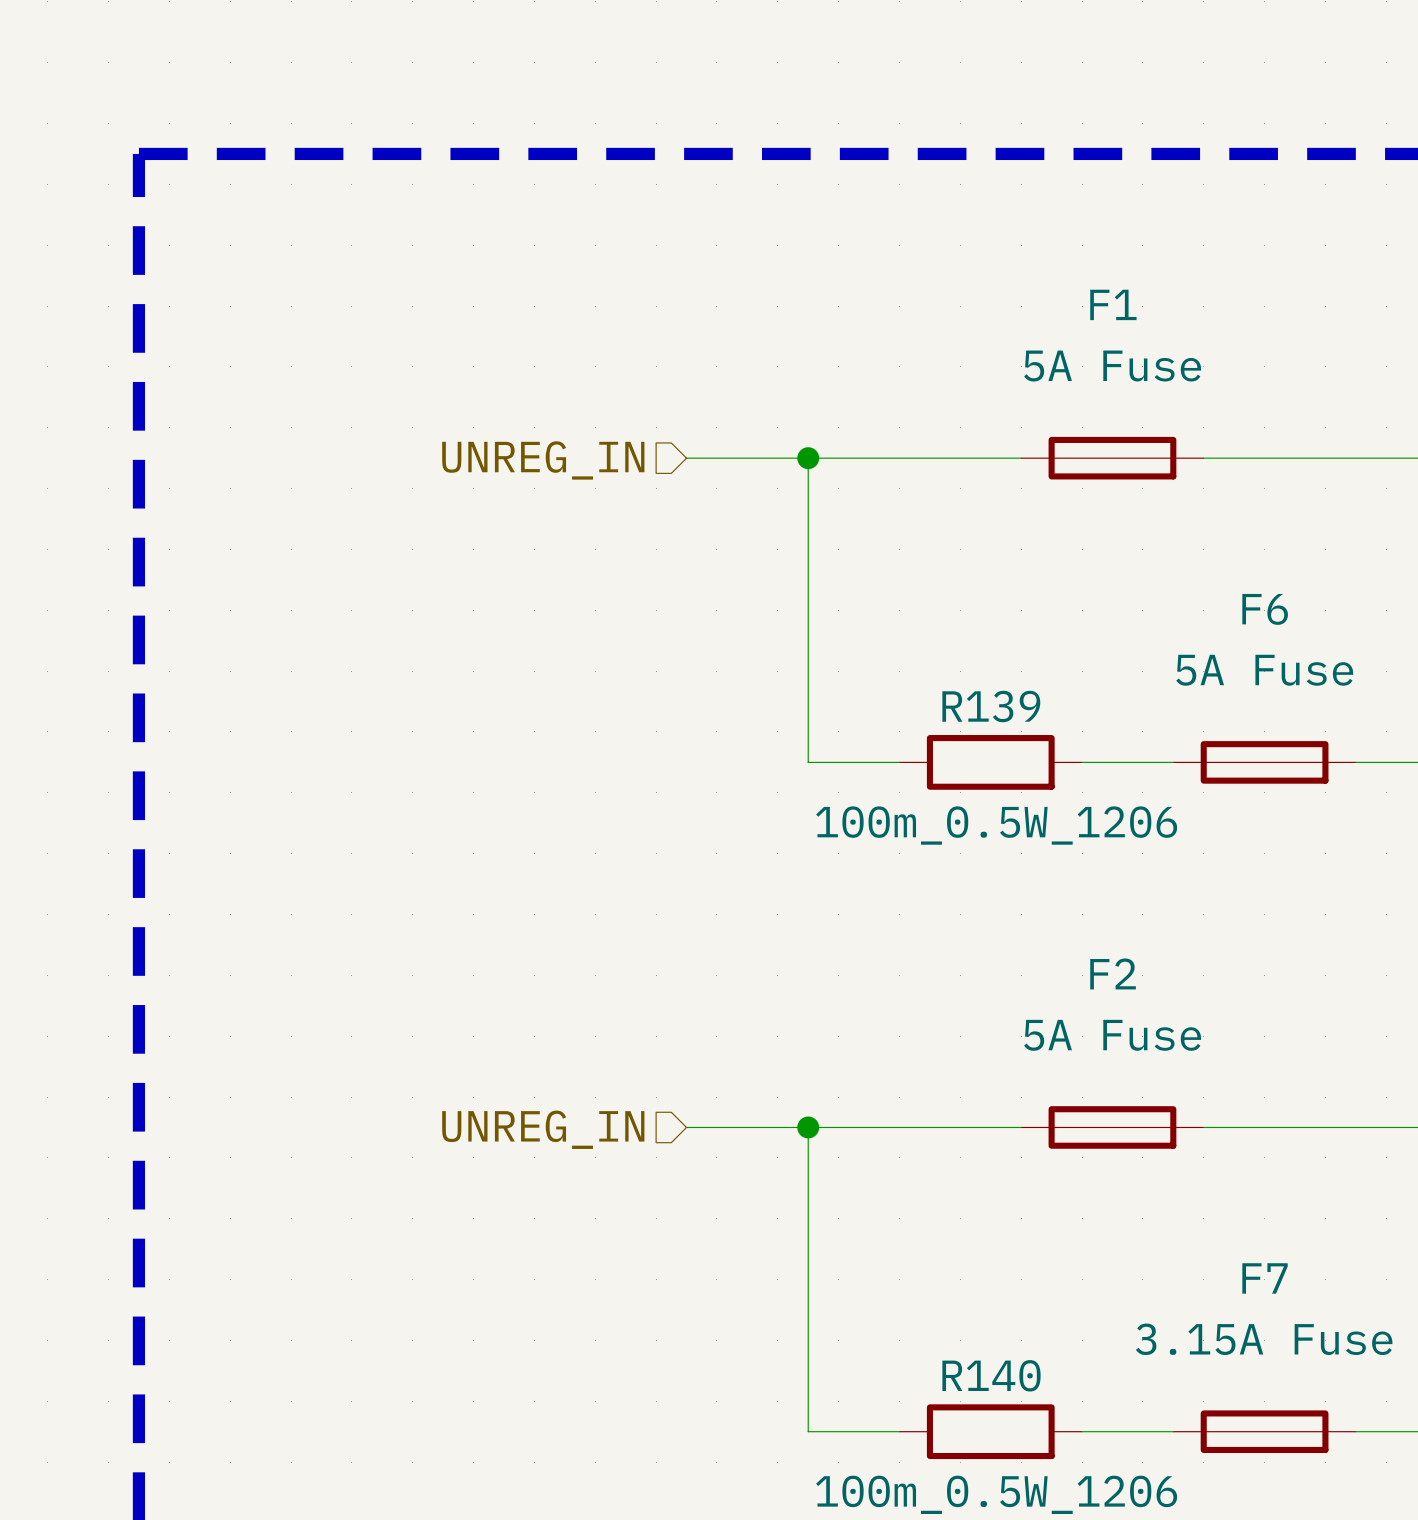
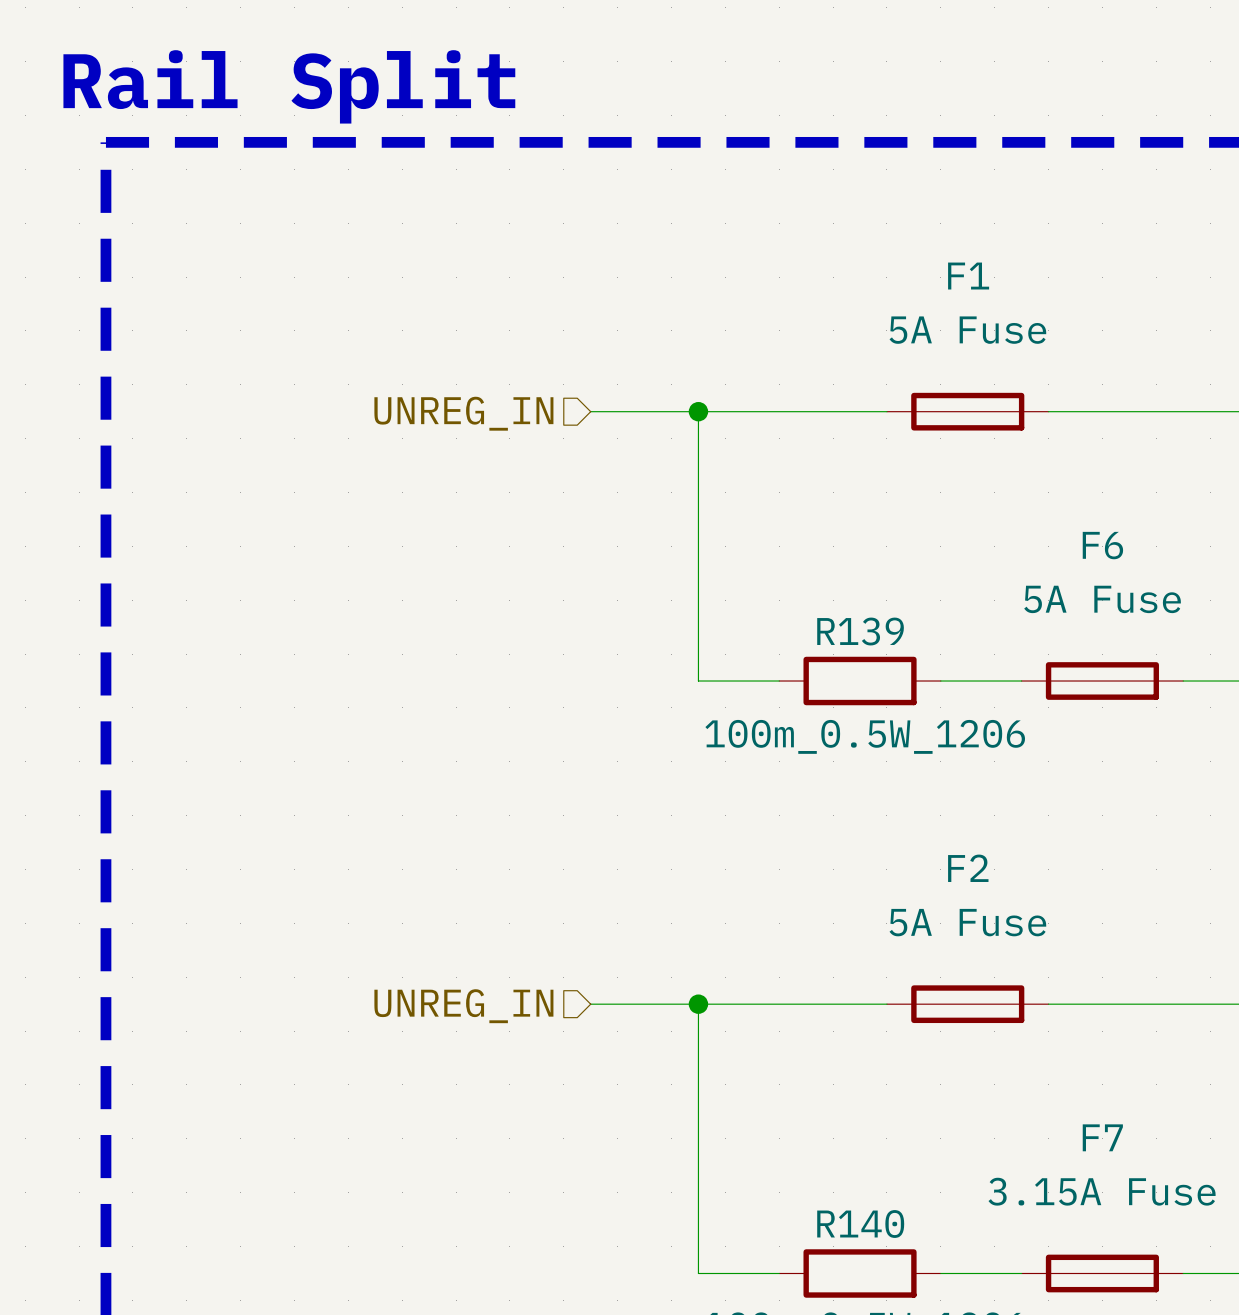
text: none -> Rail Split (289, 86)

